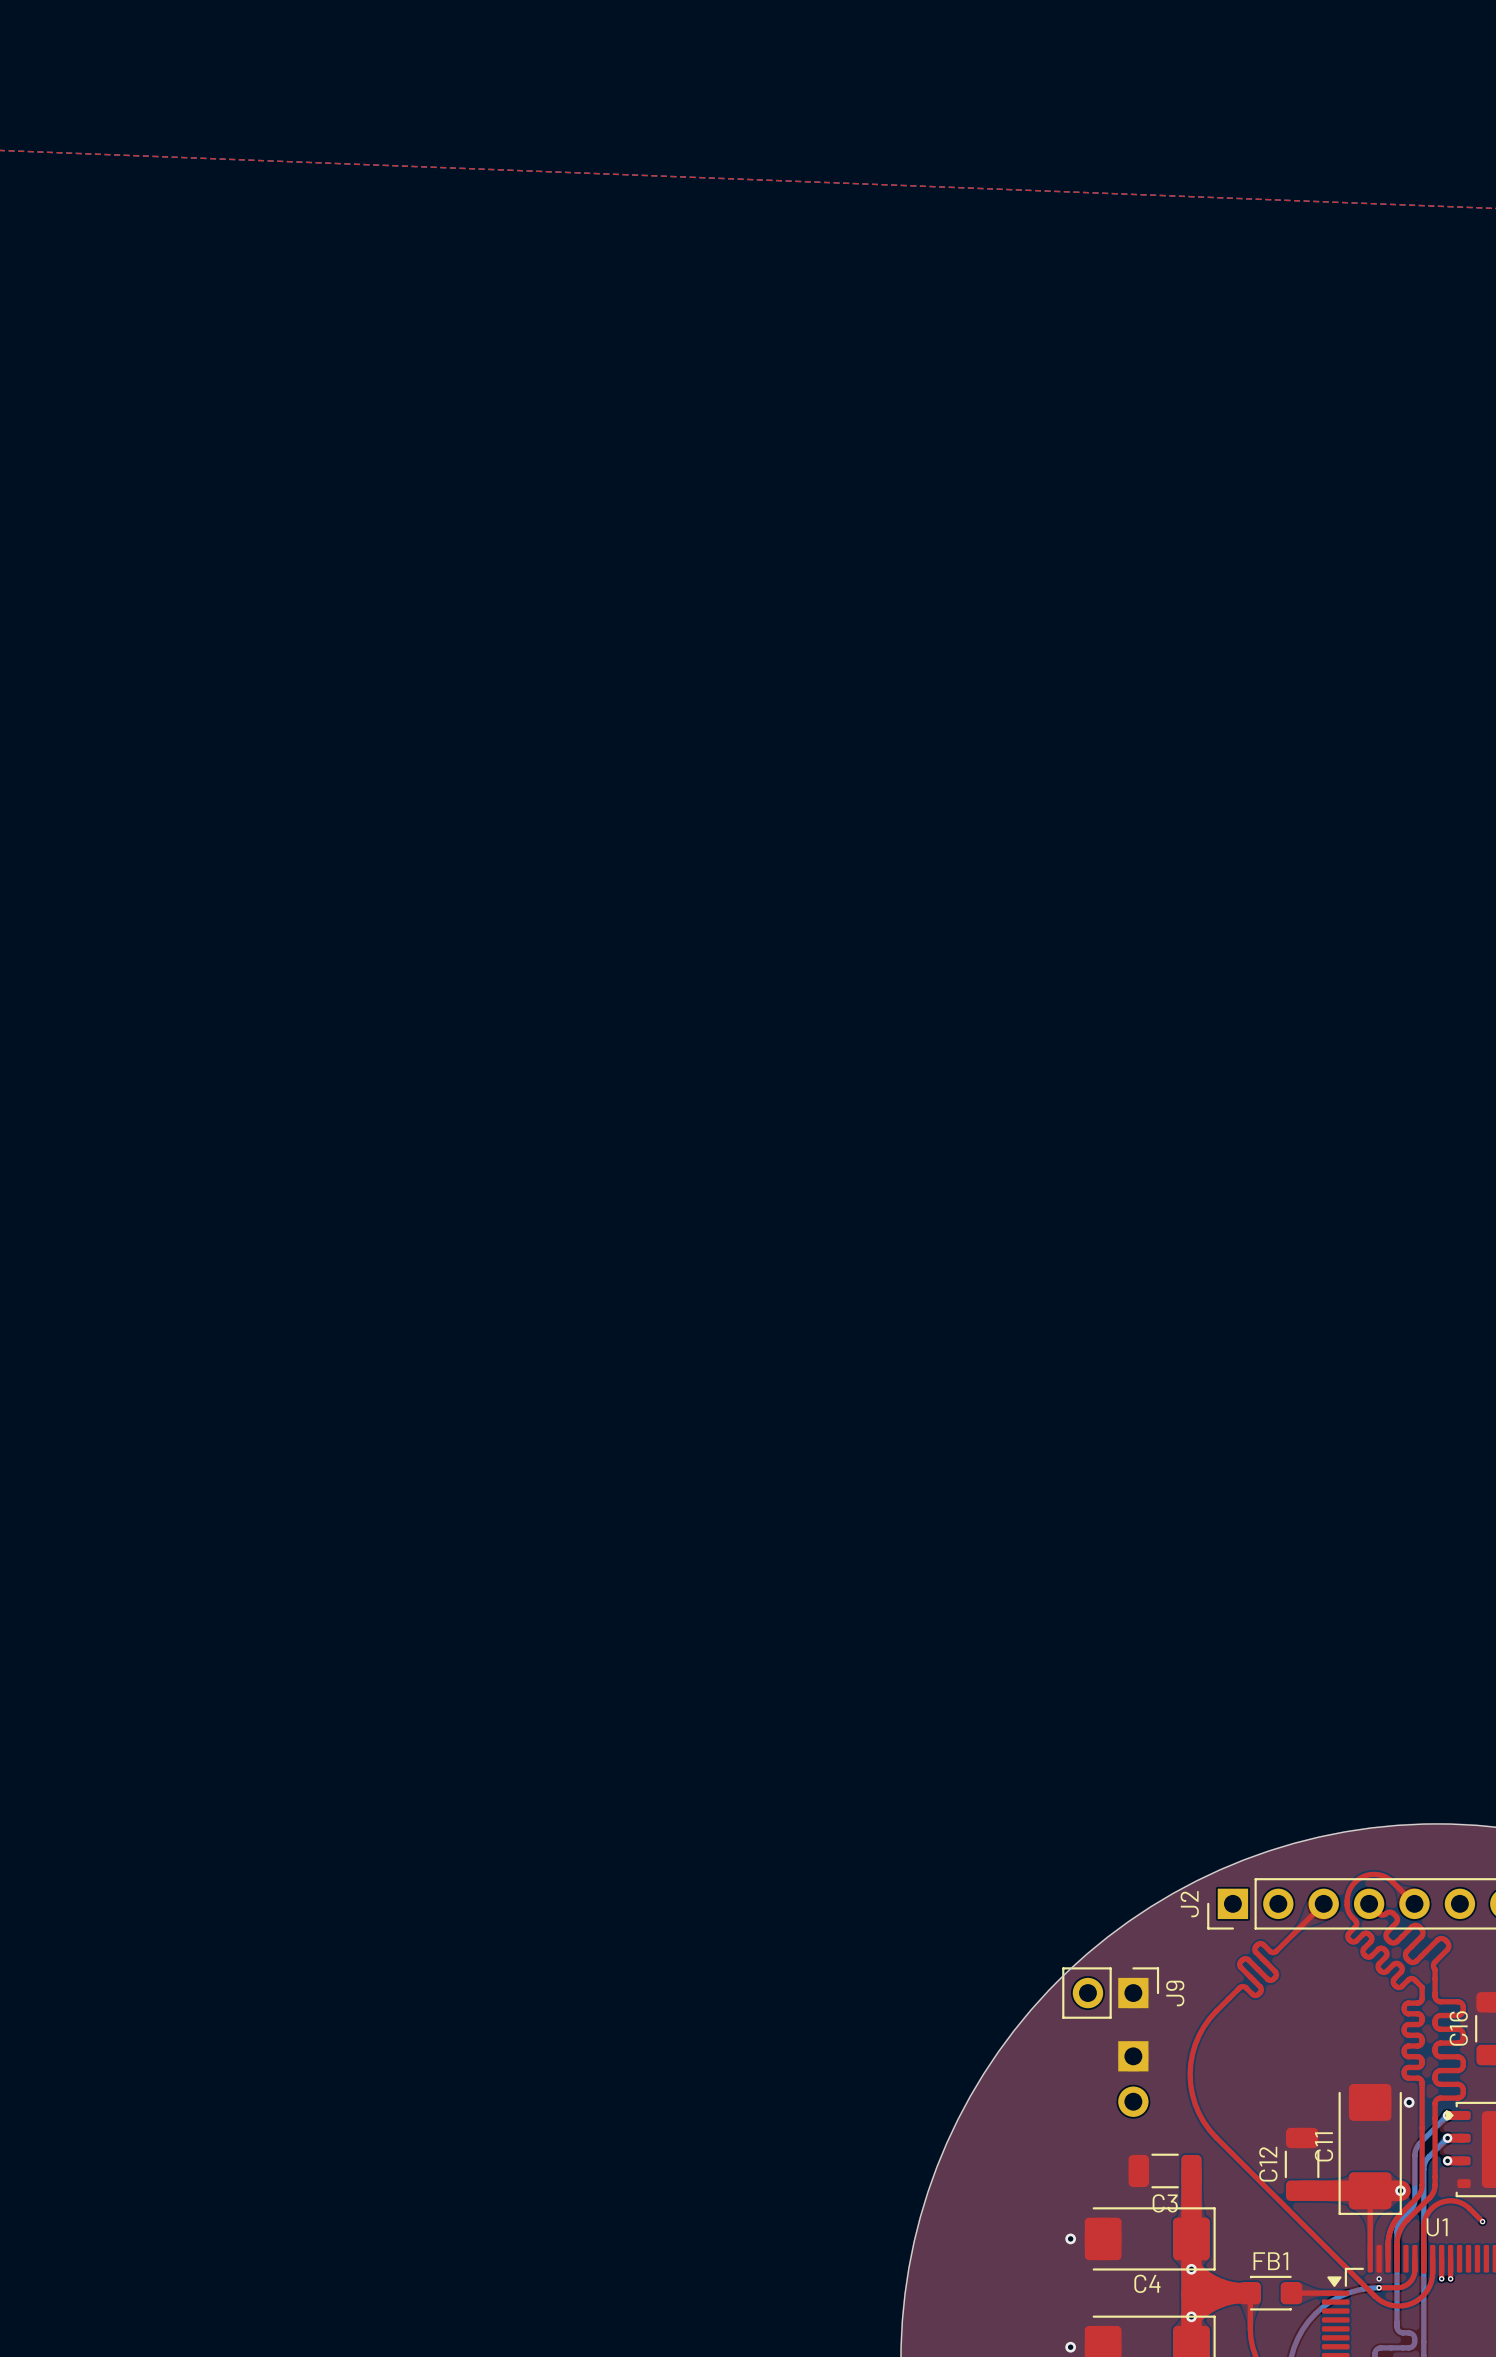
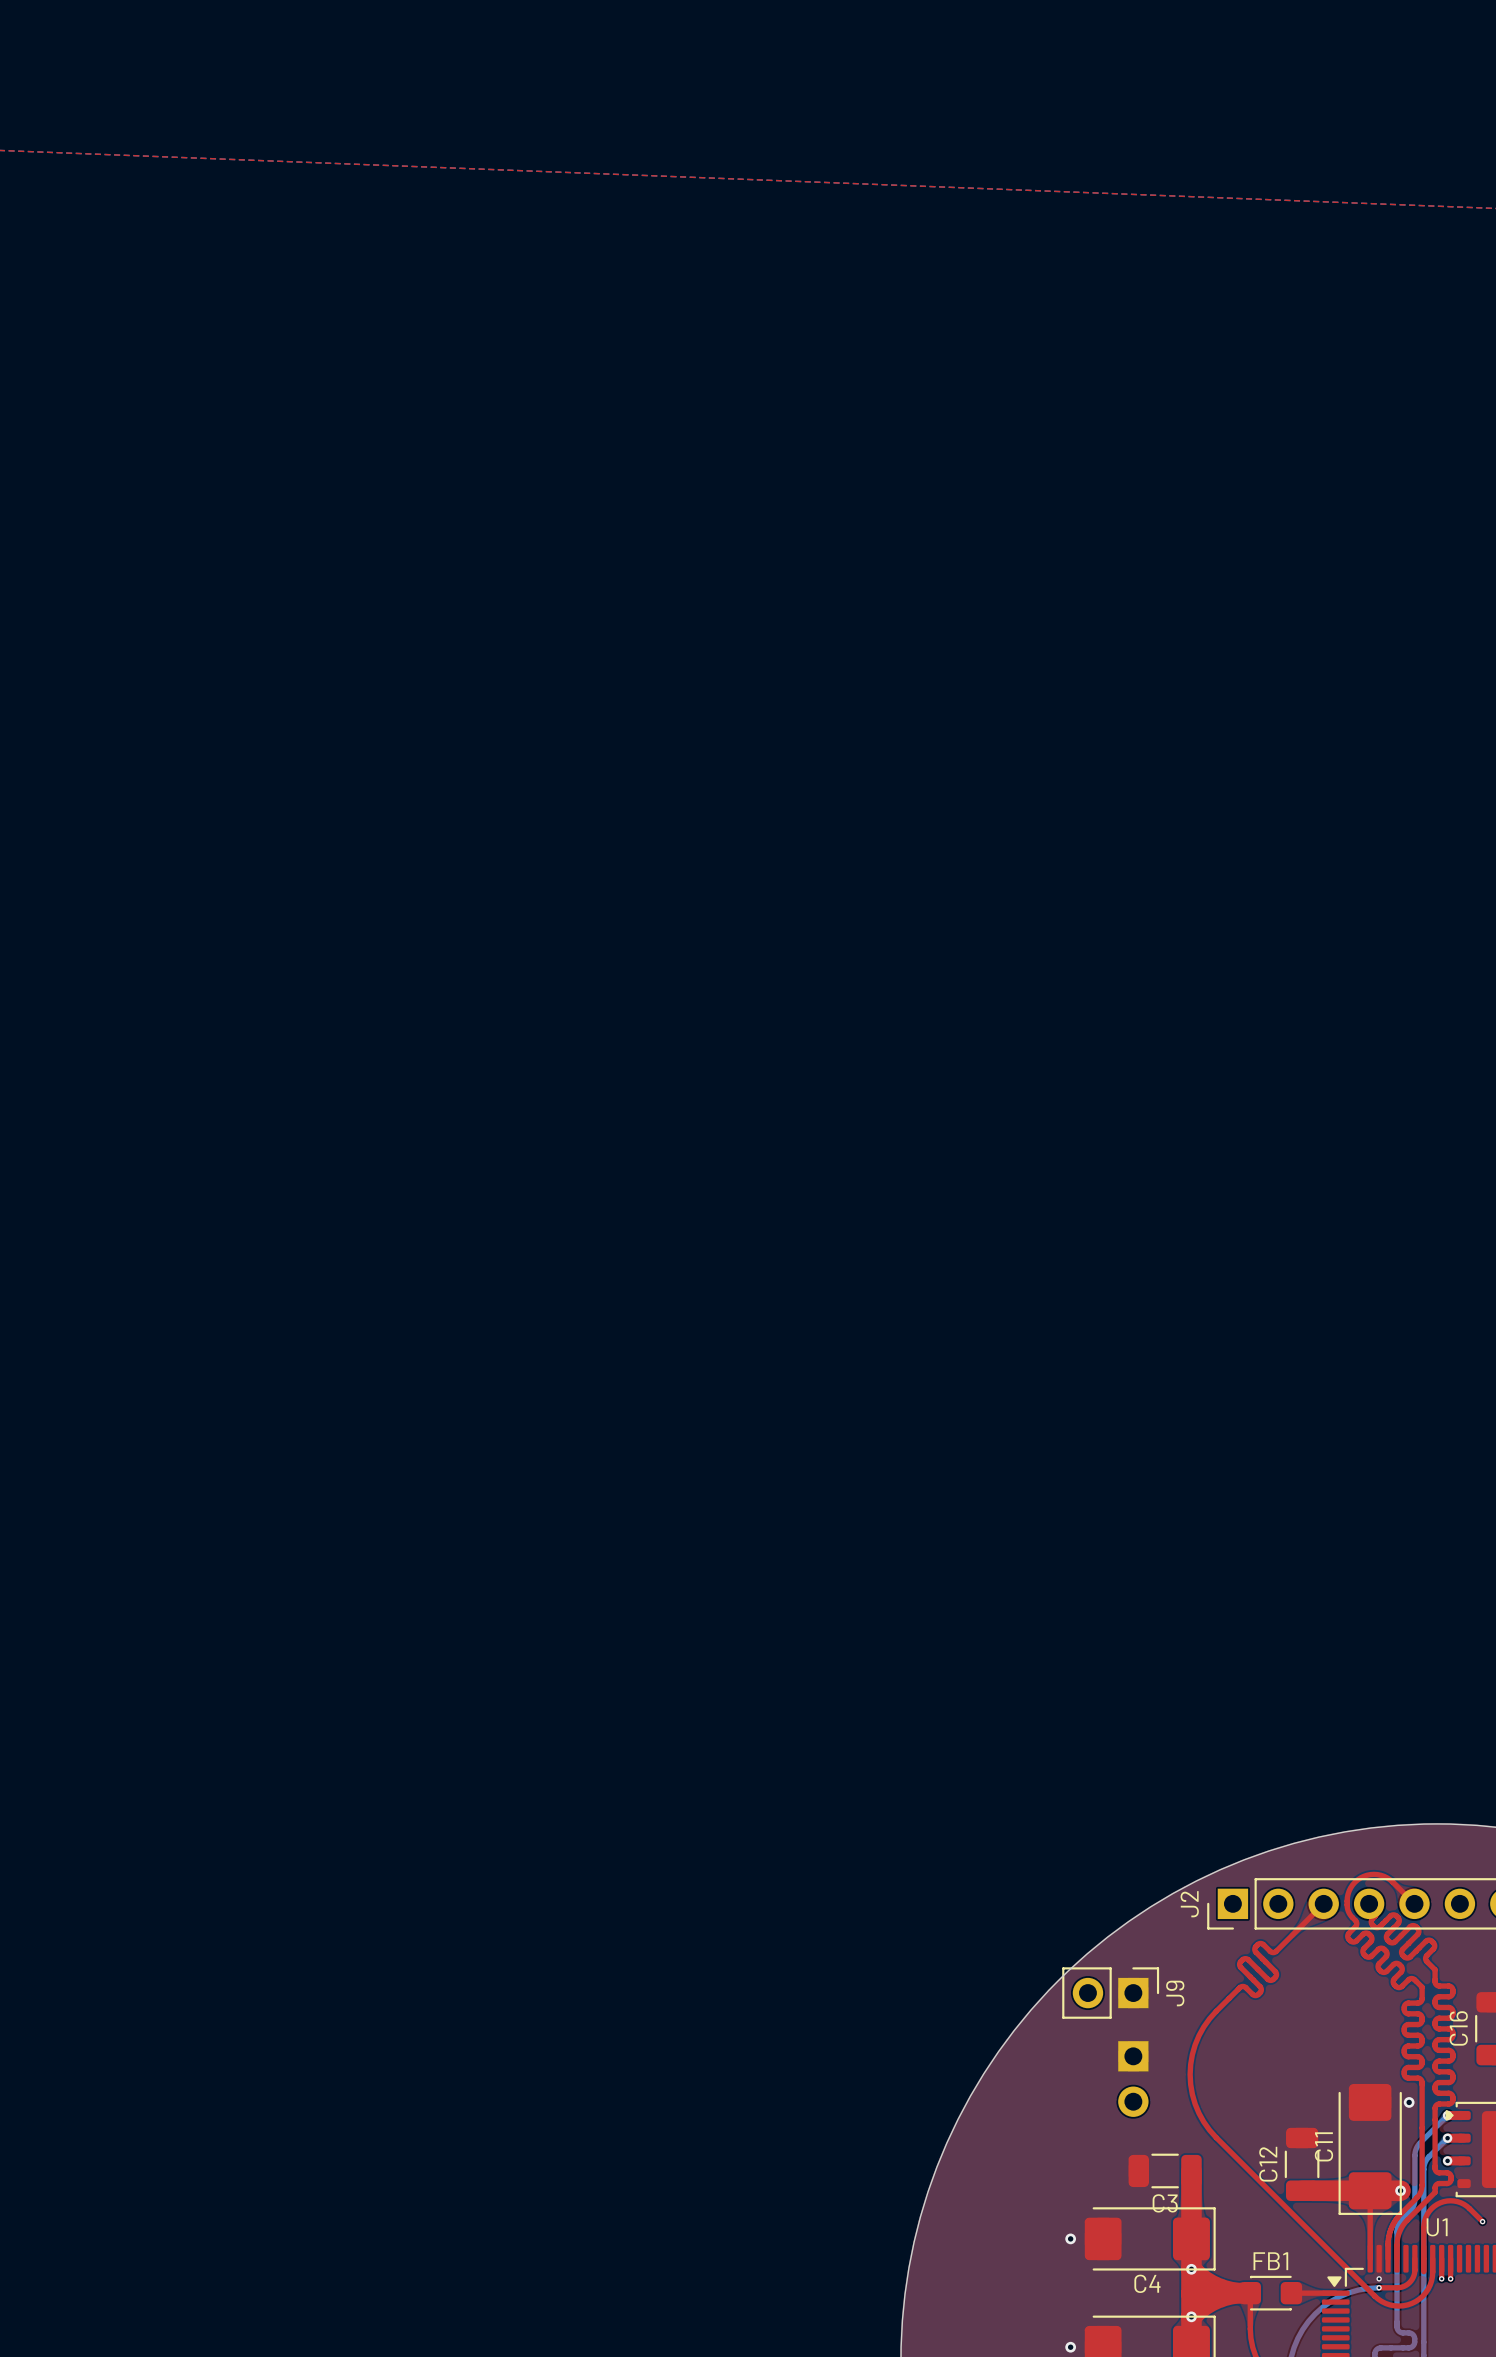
top track: (1375, 1910) (1381, 1915) (1391, 1912) (1397, 1917) (1396, 1922) (1386, 1934) (1386, 1938) (1391, 1942) (1396, 1941) (1413, 1925) (1417, 1925) (1421, 1929) (1421, 1936) (1405, 1952) (1406, 1957) (1410, 1962) (1416, 1961) (1438, 1939) (1445, 1940) (1448, 1943) (1448, 1948) (1434, 1963) (1435, 1969) -> (1375, 1910) (1376, 1914) (1371, 1921) (1375, 1927) (1379, 1926) (1392, 1915) (1398, 1918) (1398, 1923) (1386, 1935) (1390, 1942) (1394, 1941) (1411, 1926) (1414, 1926) (1418, 1929) (1417, 1934) (1402, 1950) (1402, 1954) (1405, 1957) (1410, 1957) (1426, 1940) (1431, 1941) (1434, 1947) (1425, 1959) (1435, 1969)
top track: (1435, 1981) (1436, 2000) (1459, 2001) (1463, 2007) (1460, 2014) (1438, 2015) (1435, 2022) -> (1435, 1981) (1437, 1985) (1450, 1986) (1452, 1990) (1450, 1996) (1437, 1997) (1435, 2001) (1437, 2007) (1451, 2008) (1452, 2016) (1437, 2018) (1435, 2022)
top track: (1435, 2023) (1439, 2029) (1459, 2029) (1463, 2034) (1460, 2042) (1439, 2043) (1435, 2046) (1435, 2052) (1437, 2055) (1459, 2056) (1463, 2062) (1462, 2067) (1459, 2070) (1437, 2071) (1435, 2075) (1435, 2081) (1439, 2084) (1459, 2084) (1462, 2087) (1463, 2092) (1459, 2097) (1437, 2098) (1435, 2108) -> (1435, 2023) (1437, 2028) (1450, 2029) (1452, 2033) (1450, 2038) (1437, 2039) (1435, 2043) (1437, 2049) (1449, 2050) (1452, 2053) (1450, 2060) (1437, 2061) (1435, 2065) (1437, 2071) (1451, 2072) (1452, 2080) (1449, 2082) (1437, 2082) (1435, 2088) (1437, 2093) (1450, 2093) (1452, 2100) (1449, 2103) (1437, 2104) (1435, 2108)
top track: (1435, 2168) (1434, 2188) (1429, 2197) -> (1435, 2168) (1437, 2172) (1449, 2173) (1451, 2180) (1448, 2183) (1436, 2184) (1435, 2192) (1429, 2197)

